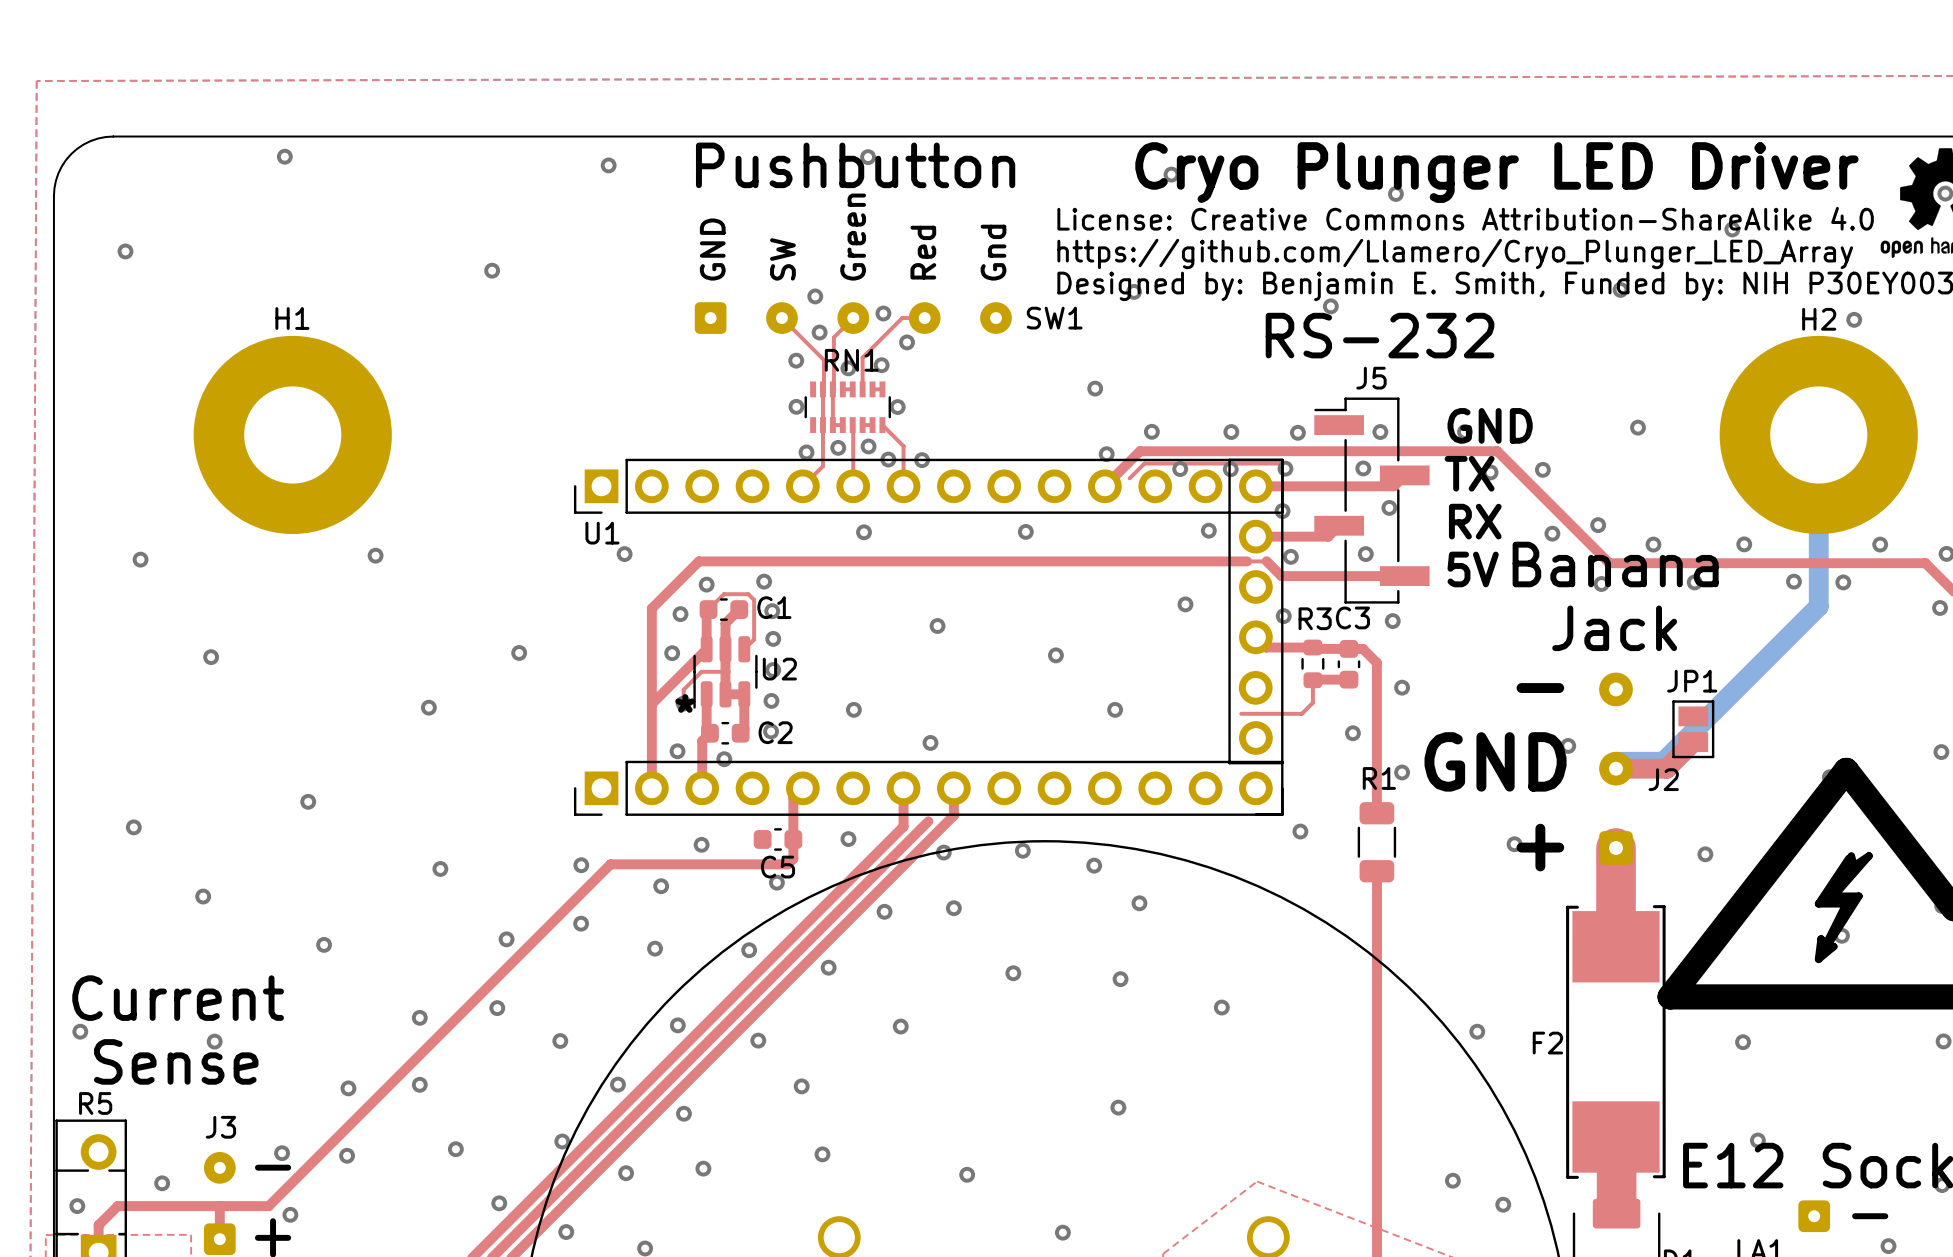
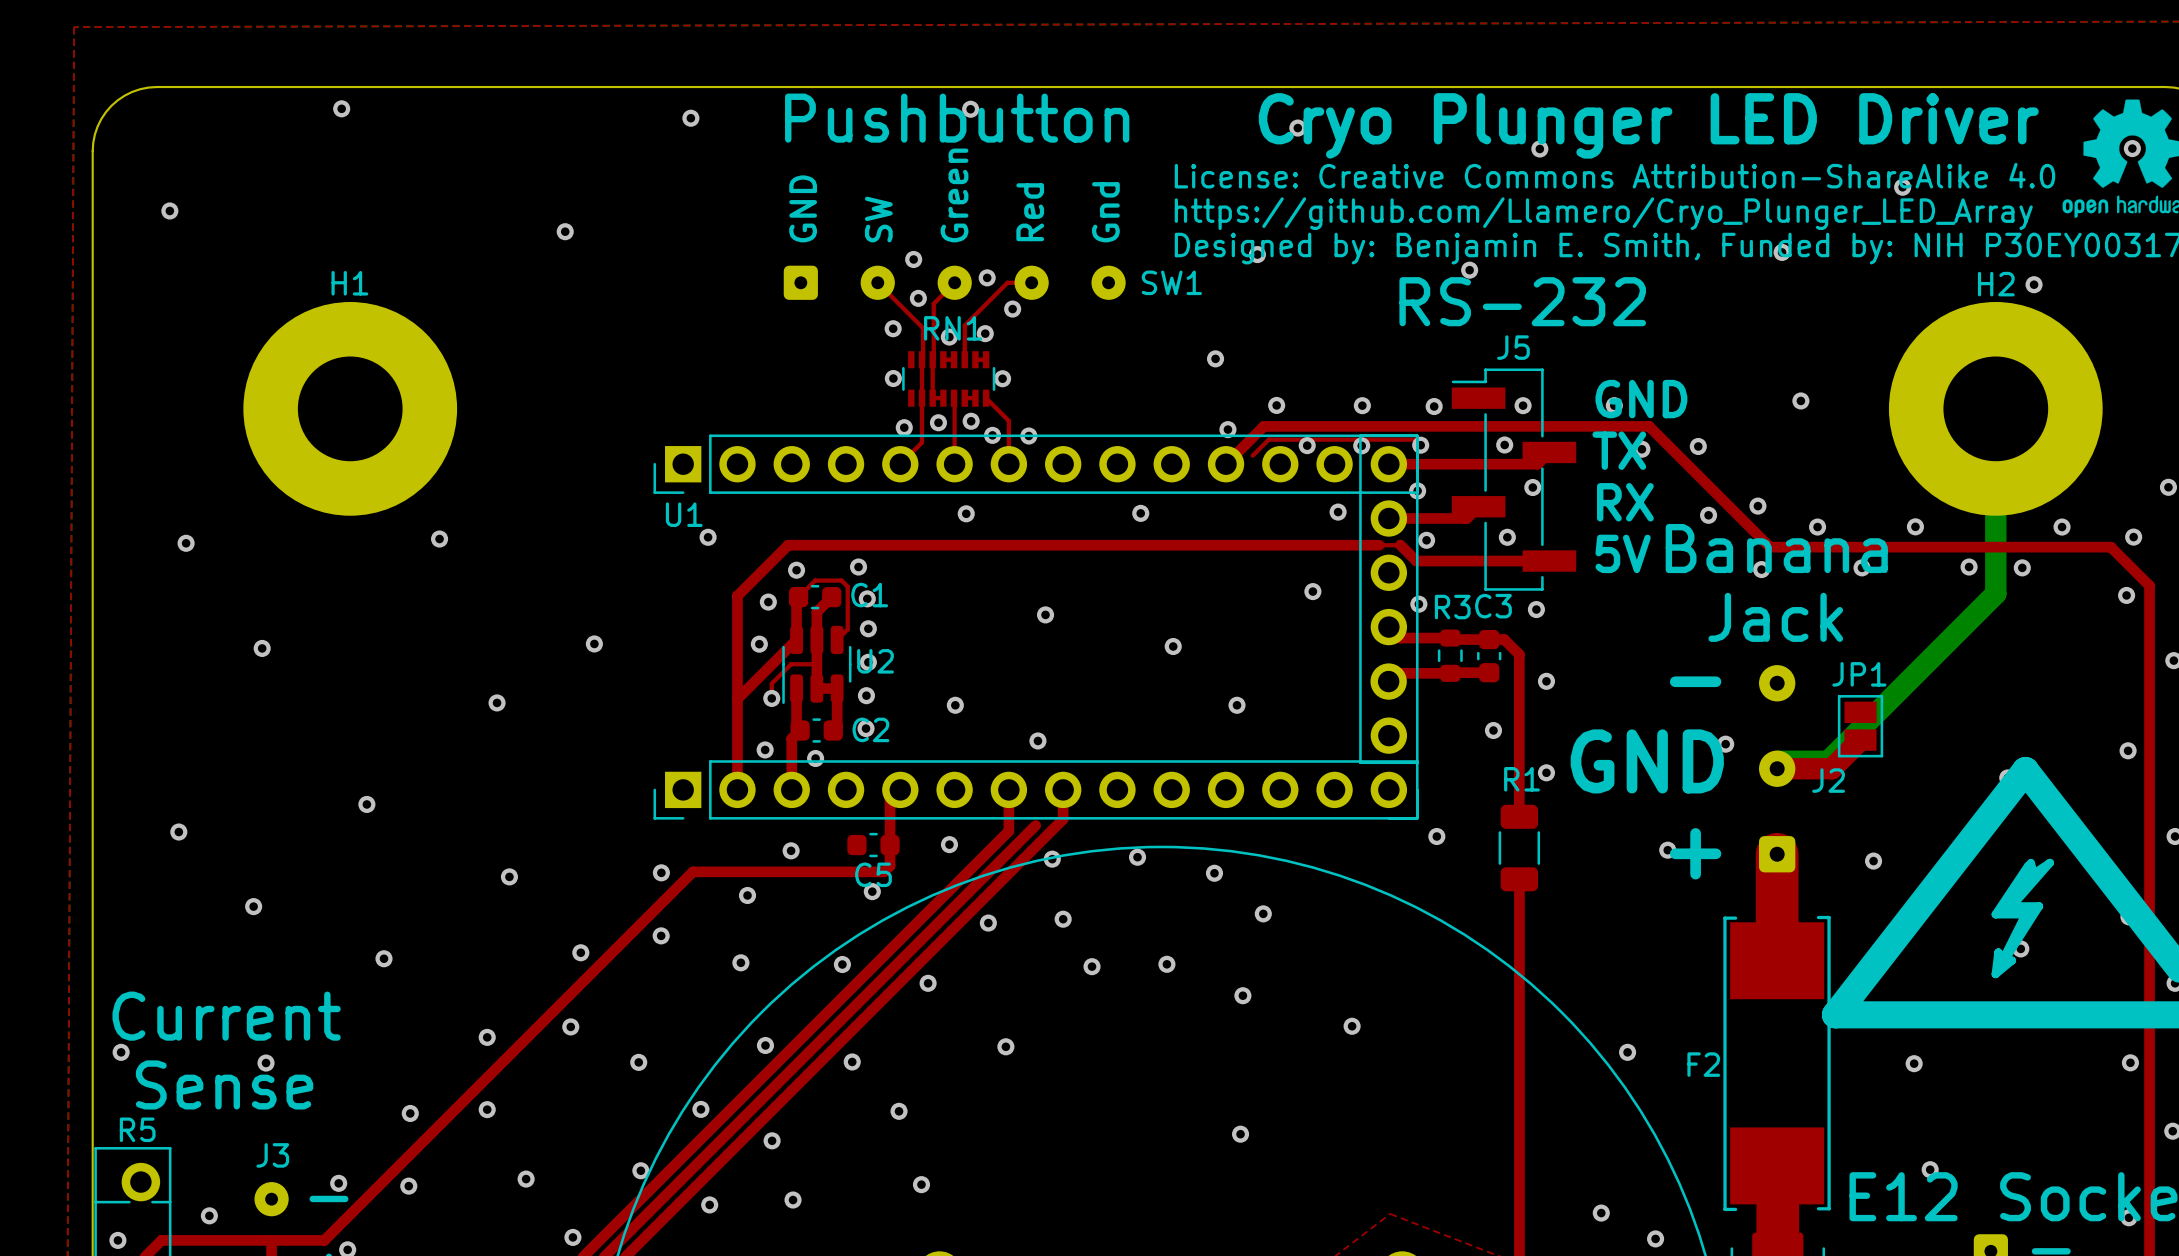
top track: (1312, 680) (1312, 702) (1301, 713) (1241, 713) -> (1450, 673) (1396, 673)
text: * (685, 703) -> none
via: none -> (1166, 964)
via: none -> (1092, 966)
via: (1013, 973) -> none
via: (967, 1174) -> none

